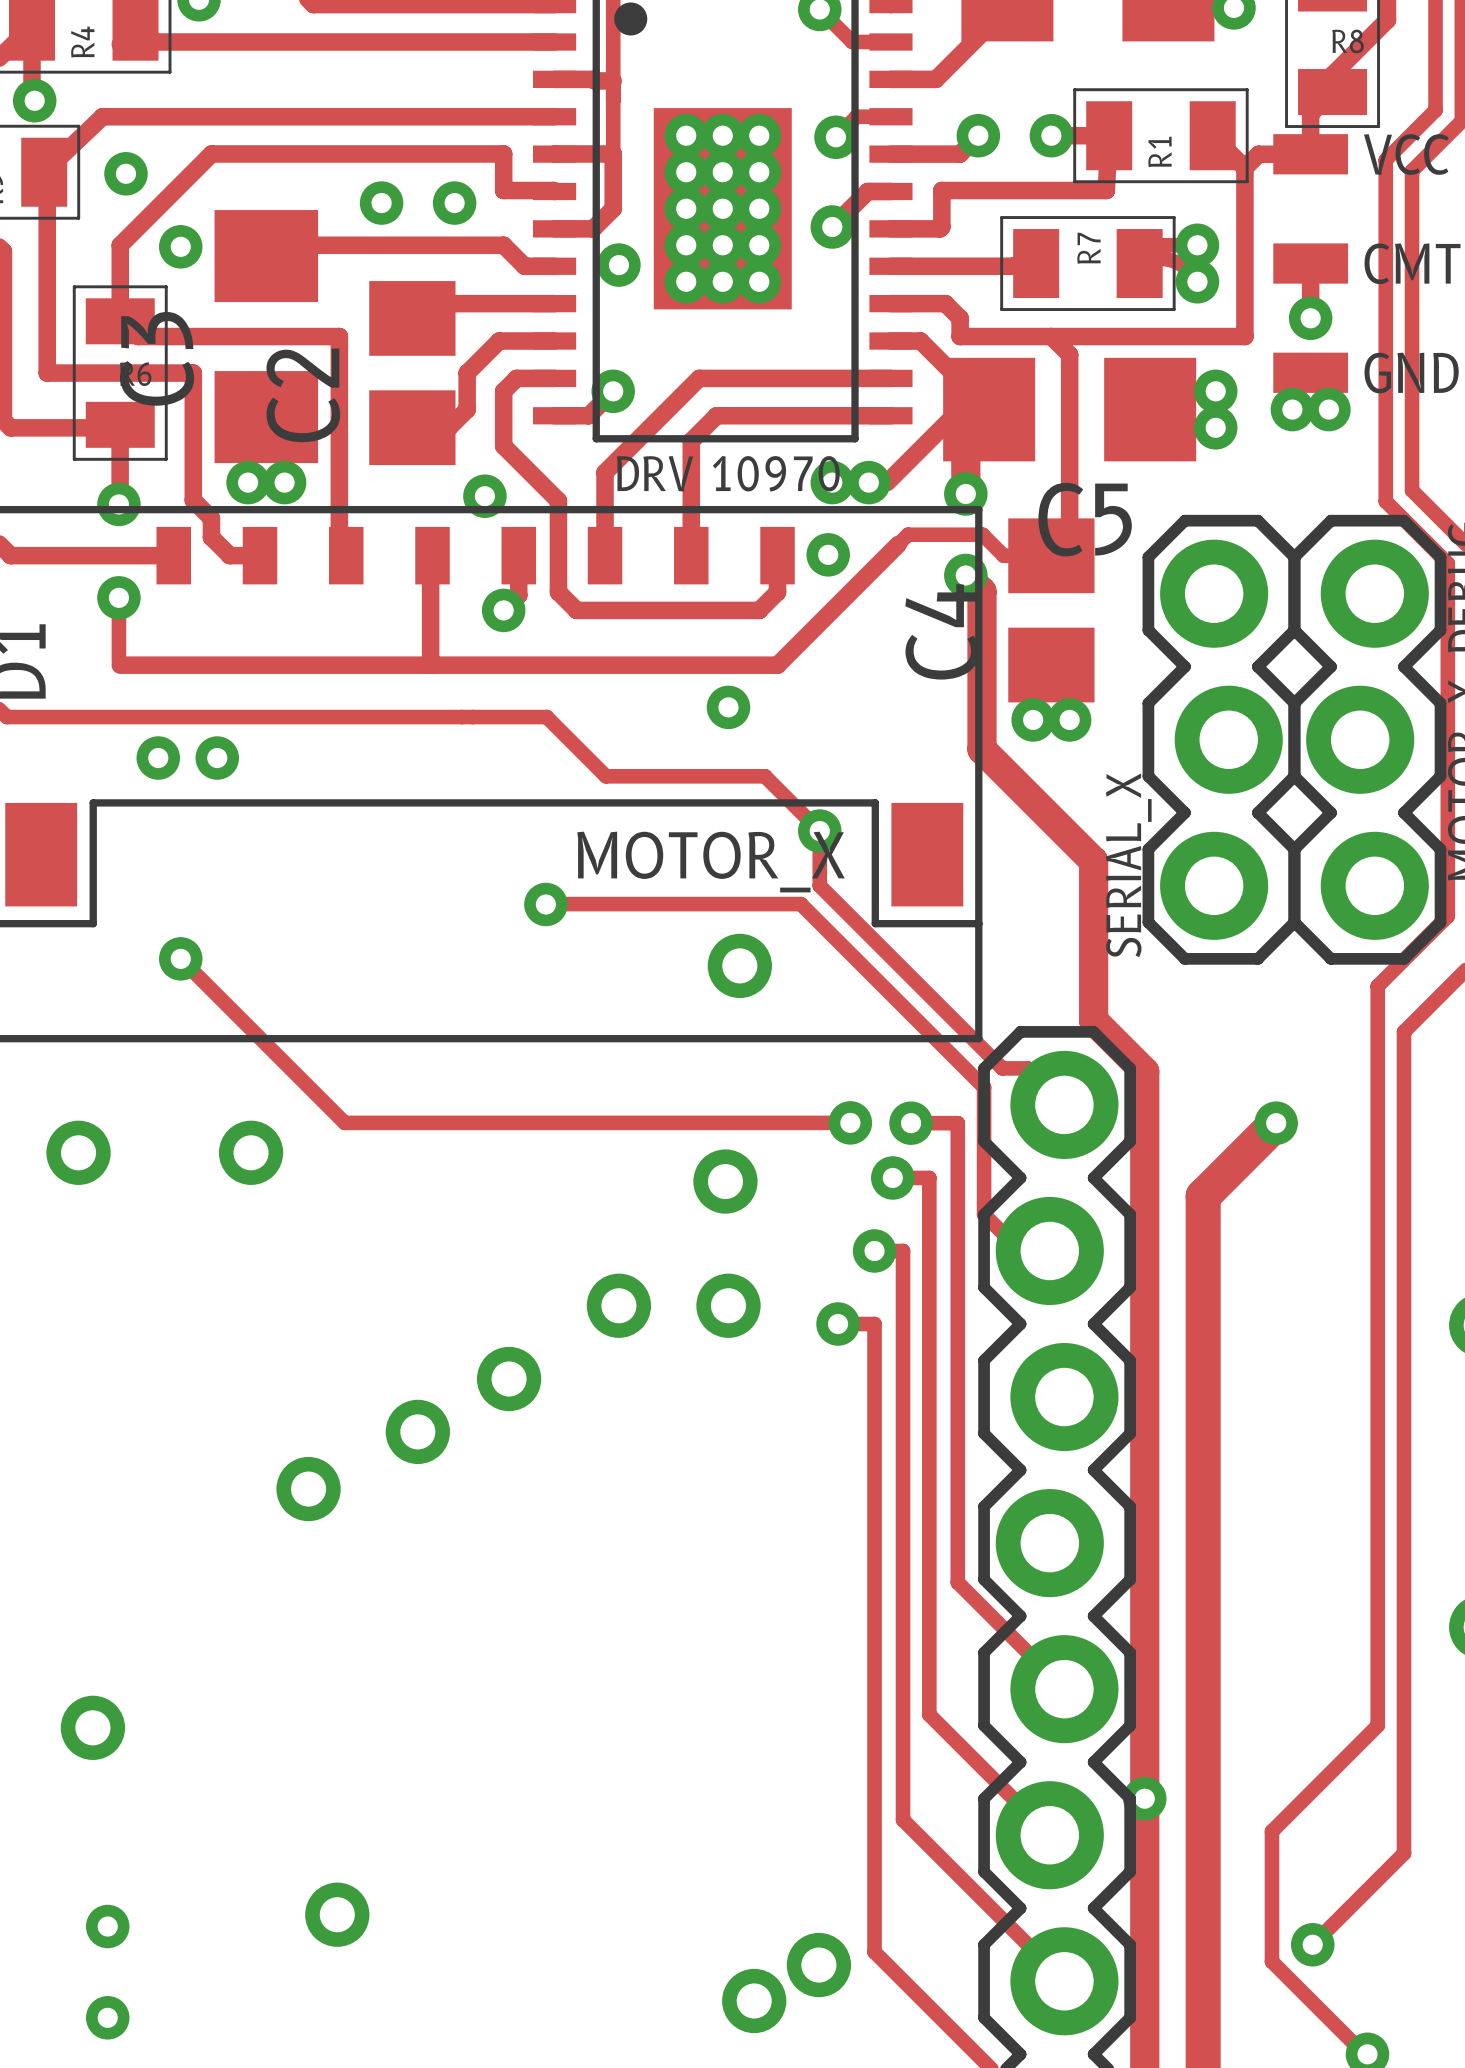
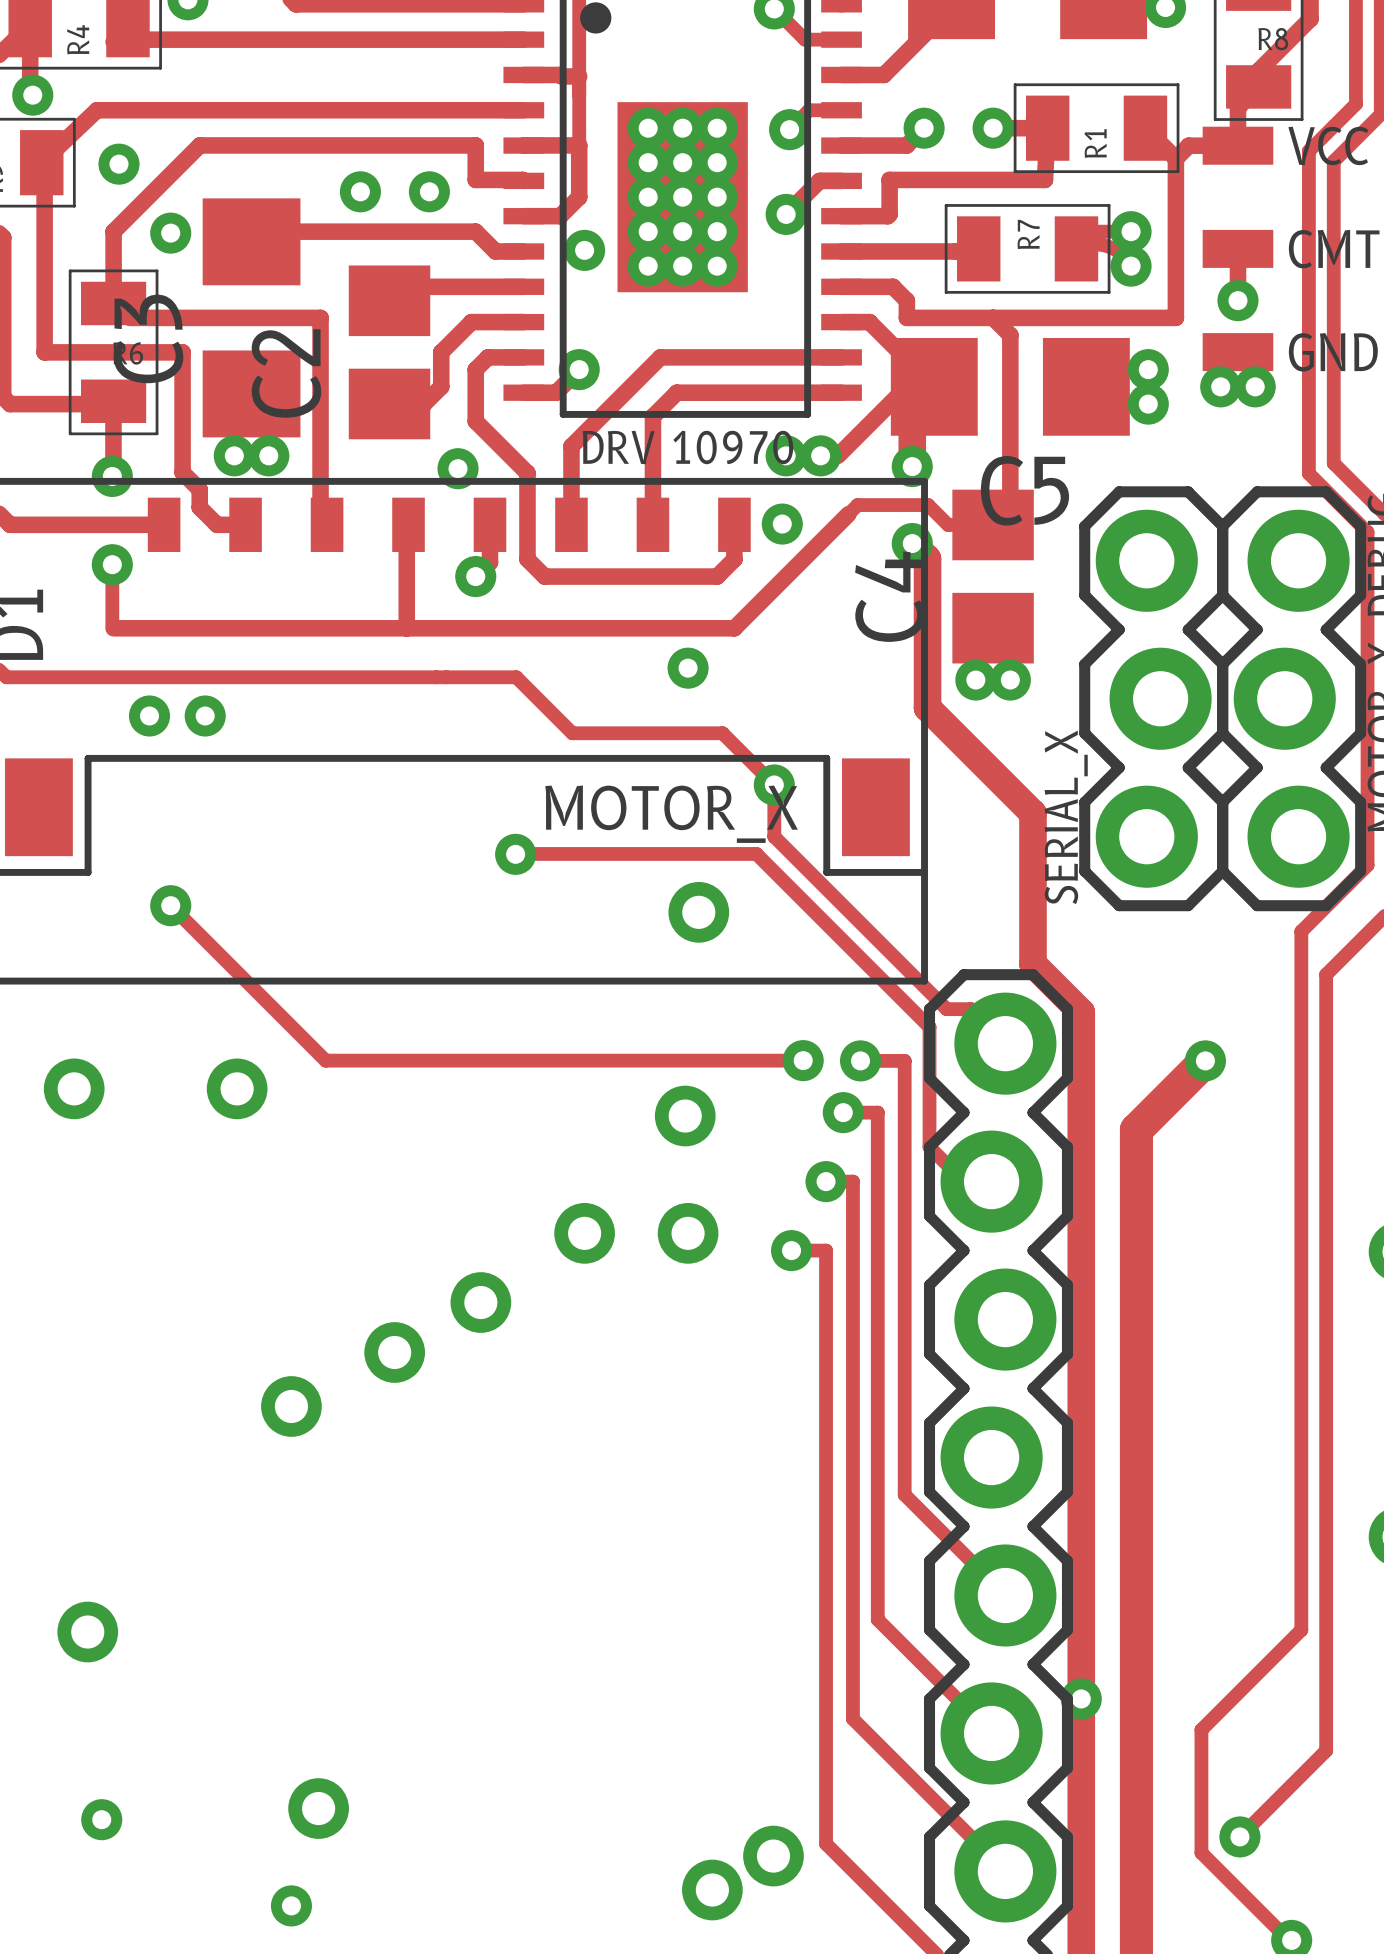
via position: (107, 2017) -> (291, 1905)

